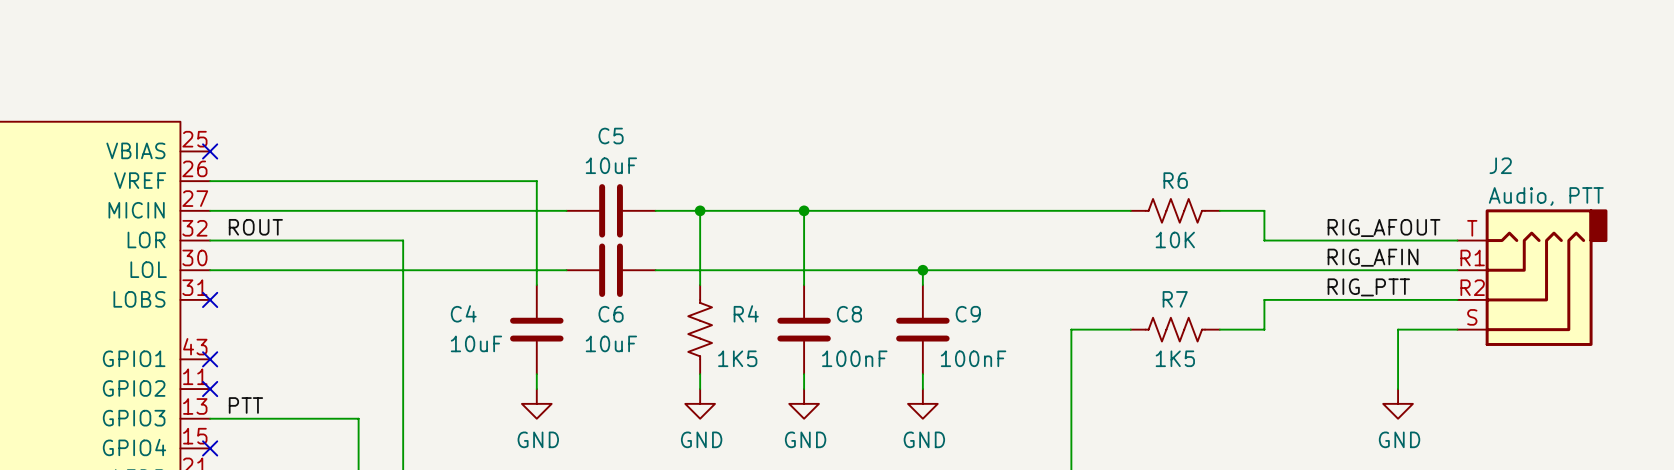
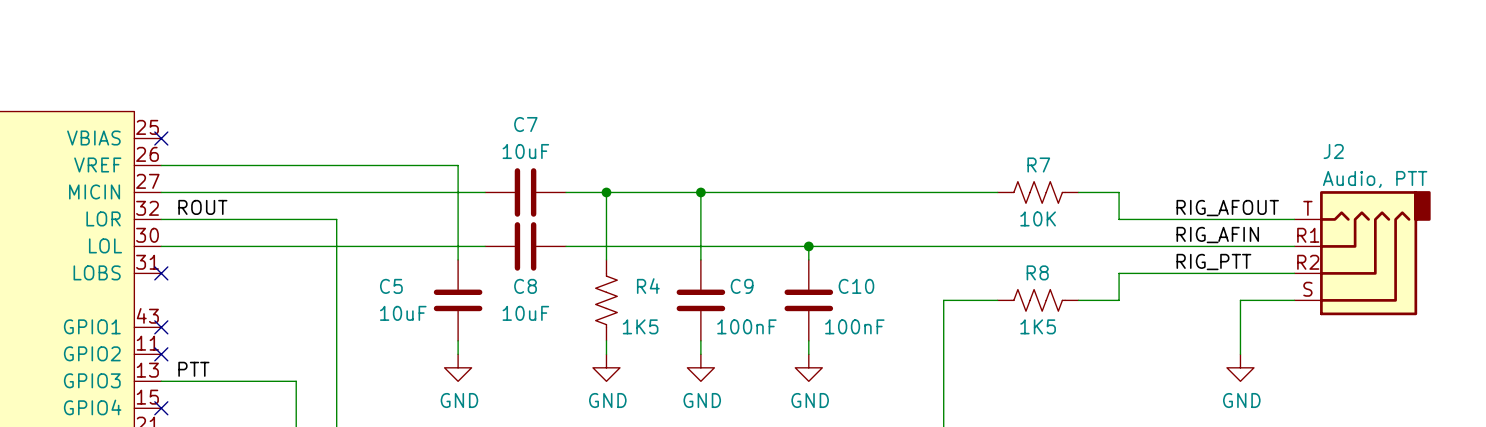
C5 name: C5 (611, 136) -> C7 (525, 124)
R6 name: R6 (1175, 180) -> R7 (1038, 164)
R7 name: R7 (1175, 299) -> R8 (1037, 272)
C4 name: C4 (463, 313) -> C5 (391, 286)
C6 name: C6 (611, 314) -> C8 (525, 286)
C8 name: C8 (849, 314) -> C9 (742, 286)
C9 name: C9 (968, 314) -> C10 (856, 286)

